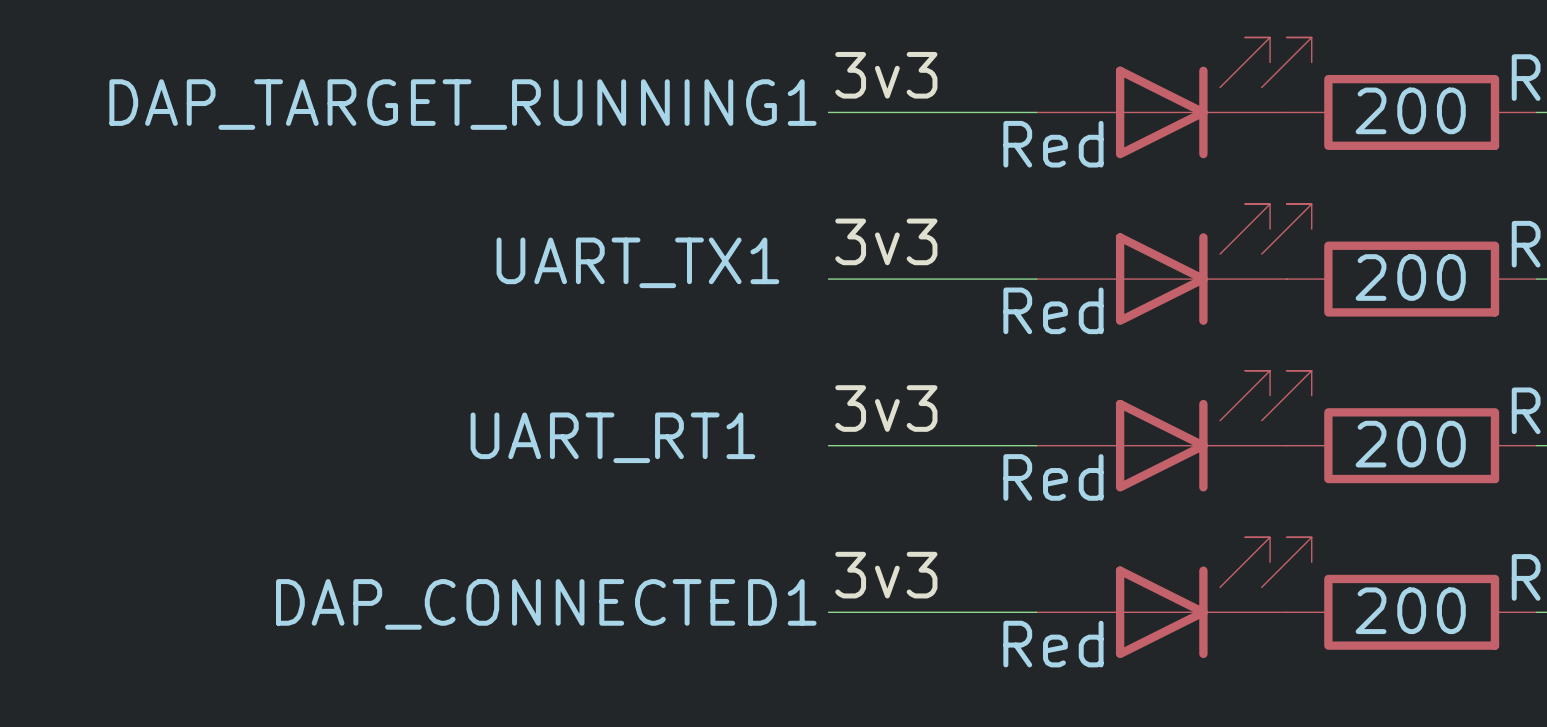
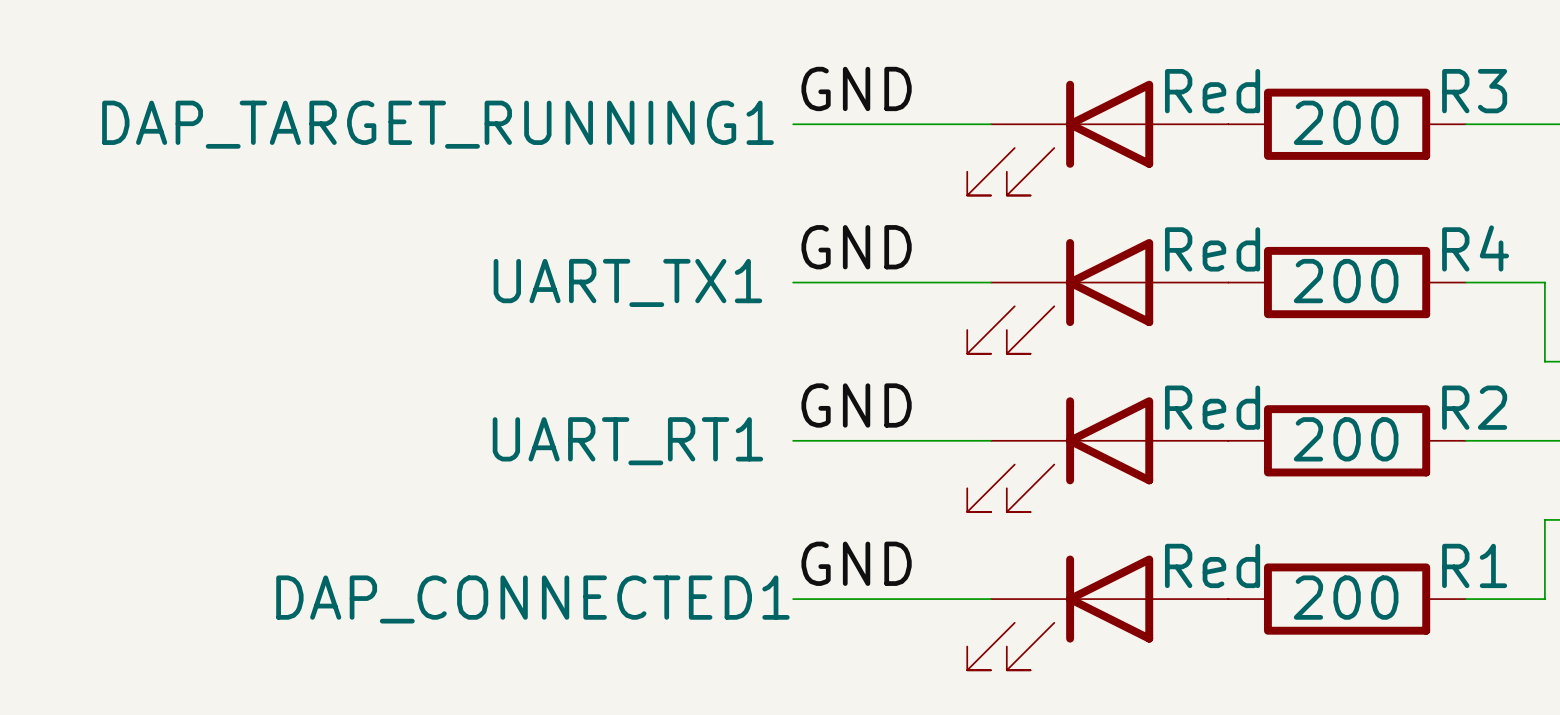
label: 3v3 (886, 75) -> GND (856, 88)
DAP_TARGET_RUNNING1 rotation: 0° (1213, 97) -> 180° (1060, 138)
label: 3v3 (886, 241) -> GND (856, 247)
UART_TX1 rotation: 0° (1213, 264) -> 180° (1060, 296)
label: 3v3 (886, 408) -> GND (856, 405)
UART_RT1 rotation: 0° (1213, 431) -> 180° (1060, 454)
UART_RT1 name position: UART_RT1 (612, 437) -> UART_RT1 (627, 441)
label: 3v3 (886, 575) -> GND (856, 563)
DAP_CONNECTED1 rotation: 0° (1213, 597) -> 180° (1060, 612)

